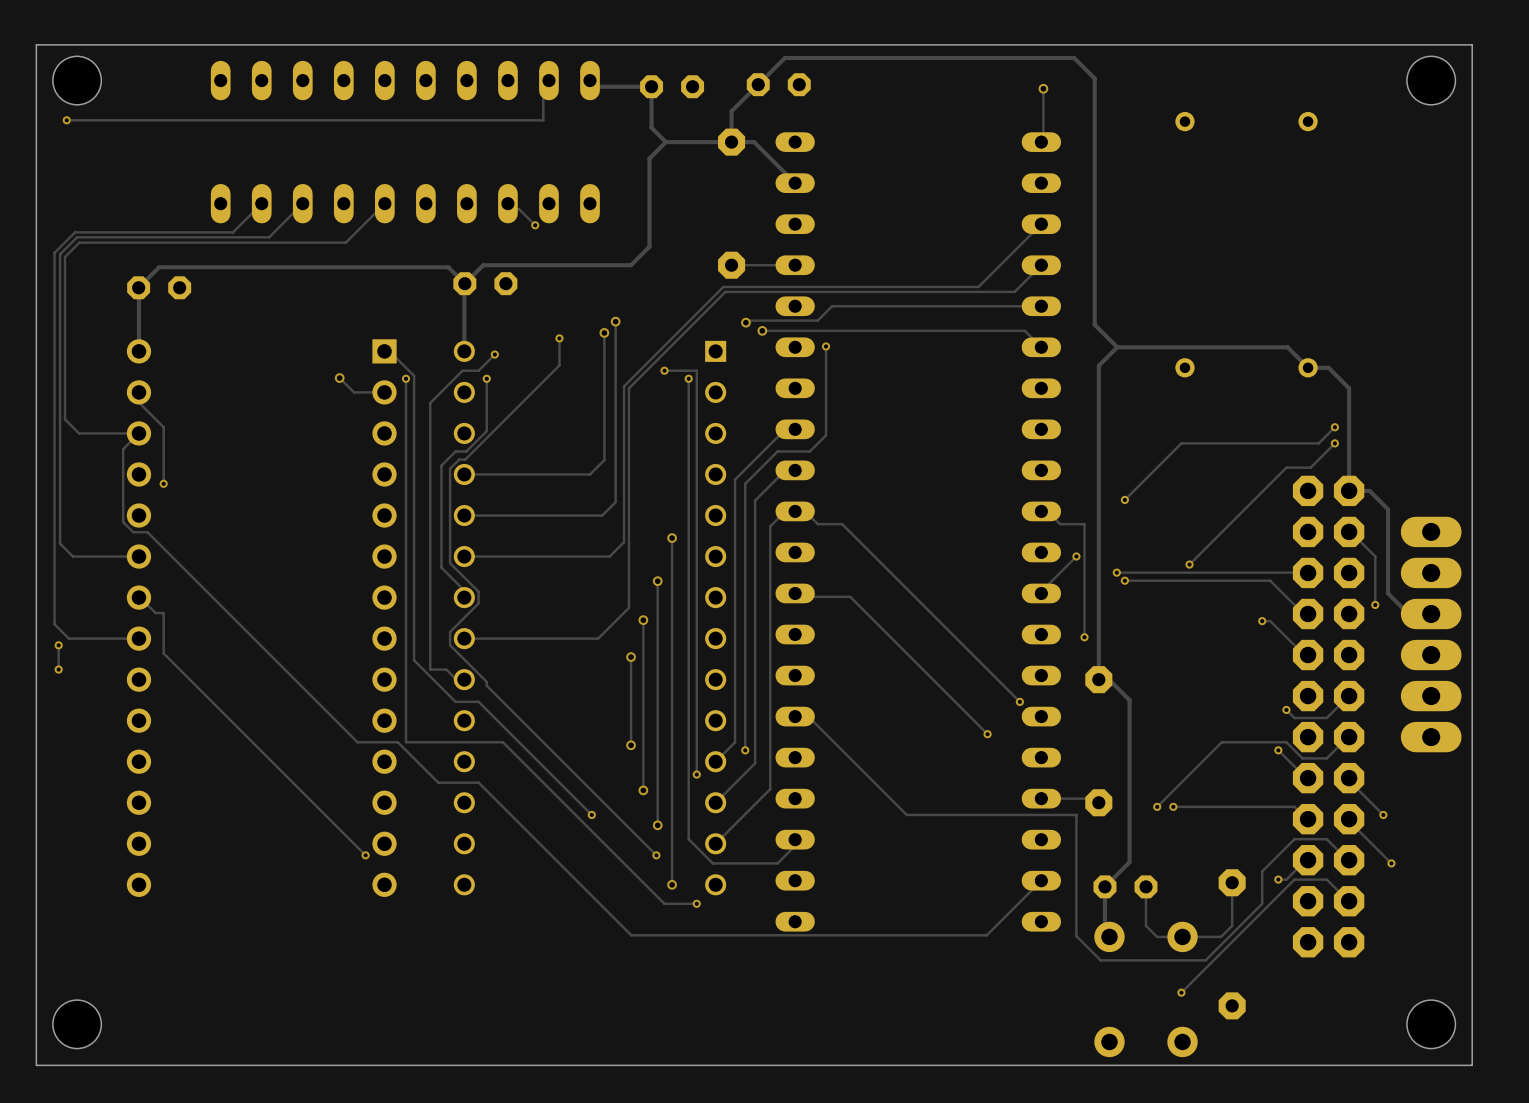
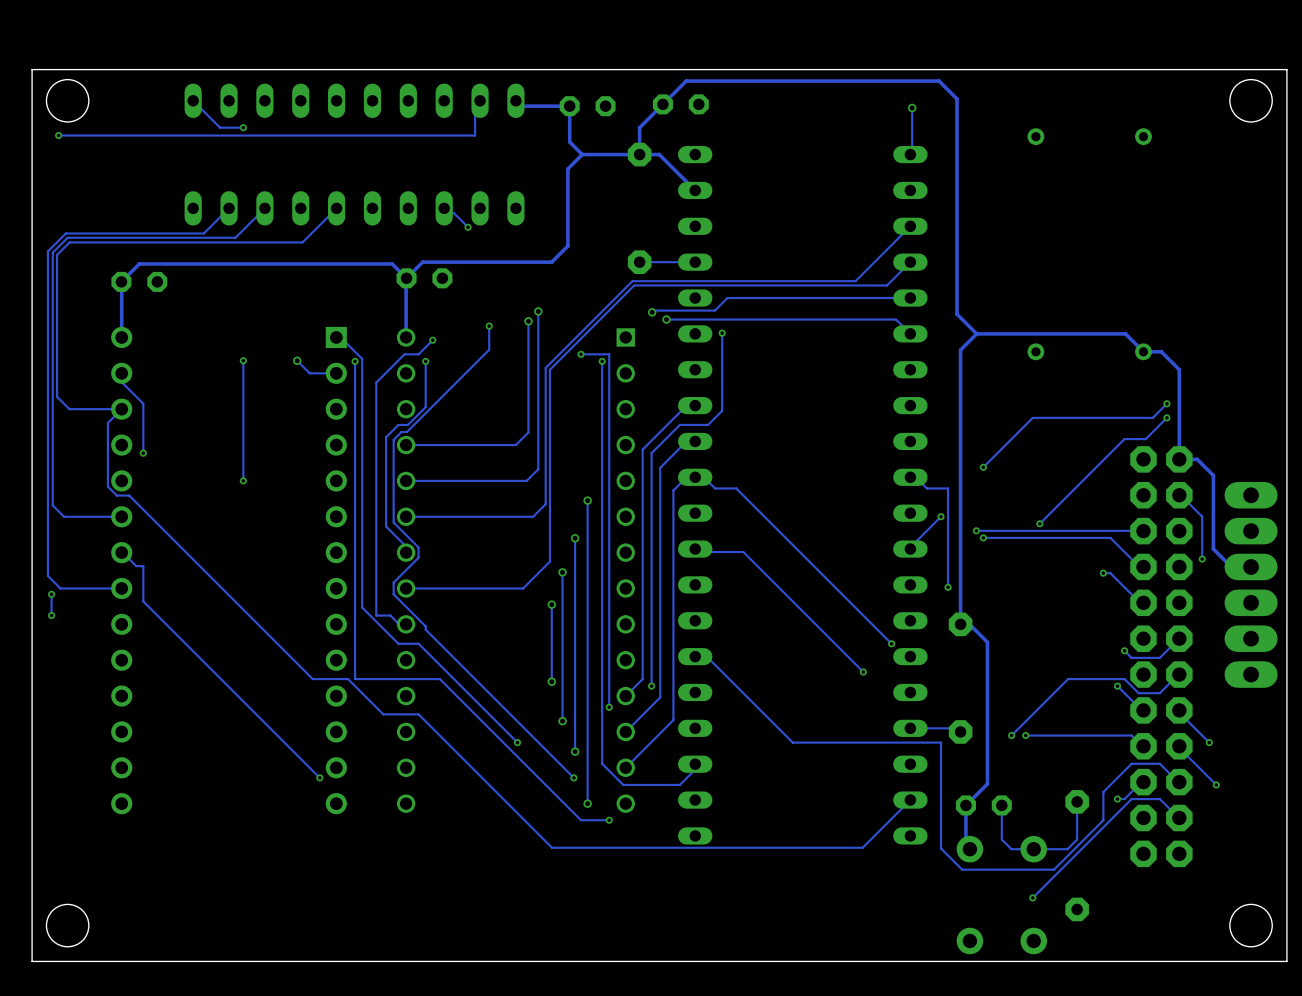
track: none -> (193, 100) (220, 127) (243, 127)
via: none -> (243, 127)
track: none -> (243, 360) (243, 480)
via: none -> (243, 360)
via: none -> (243, 480)

